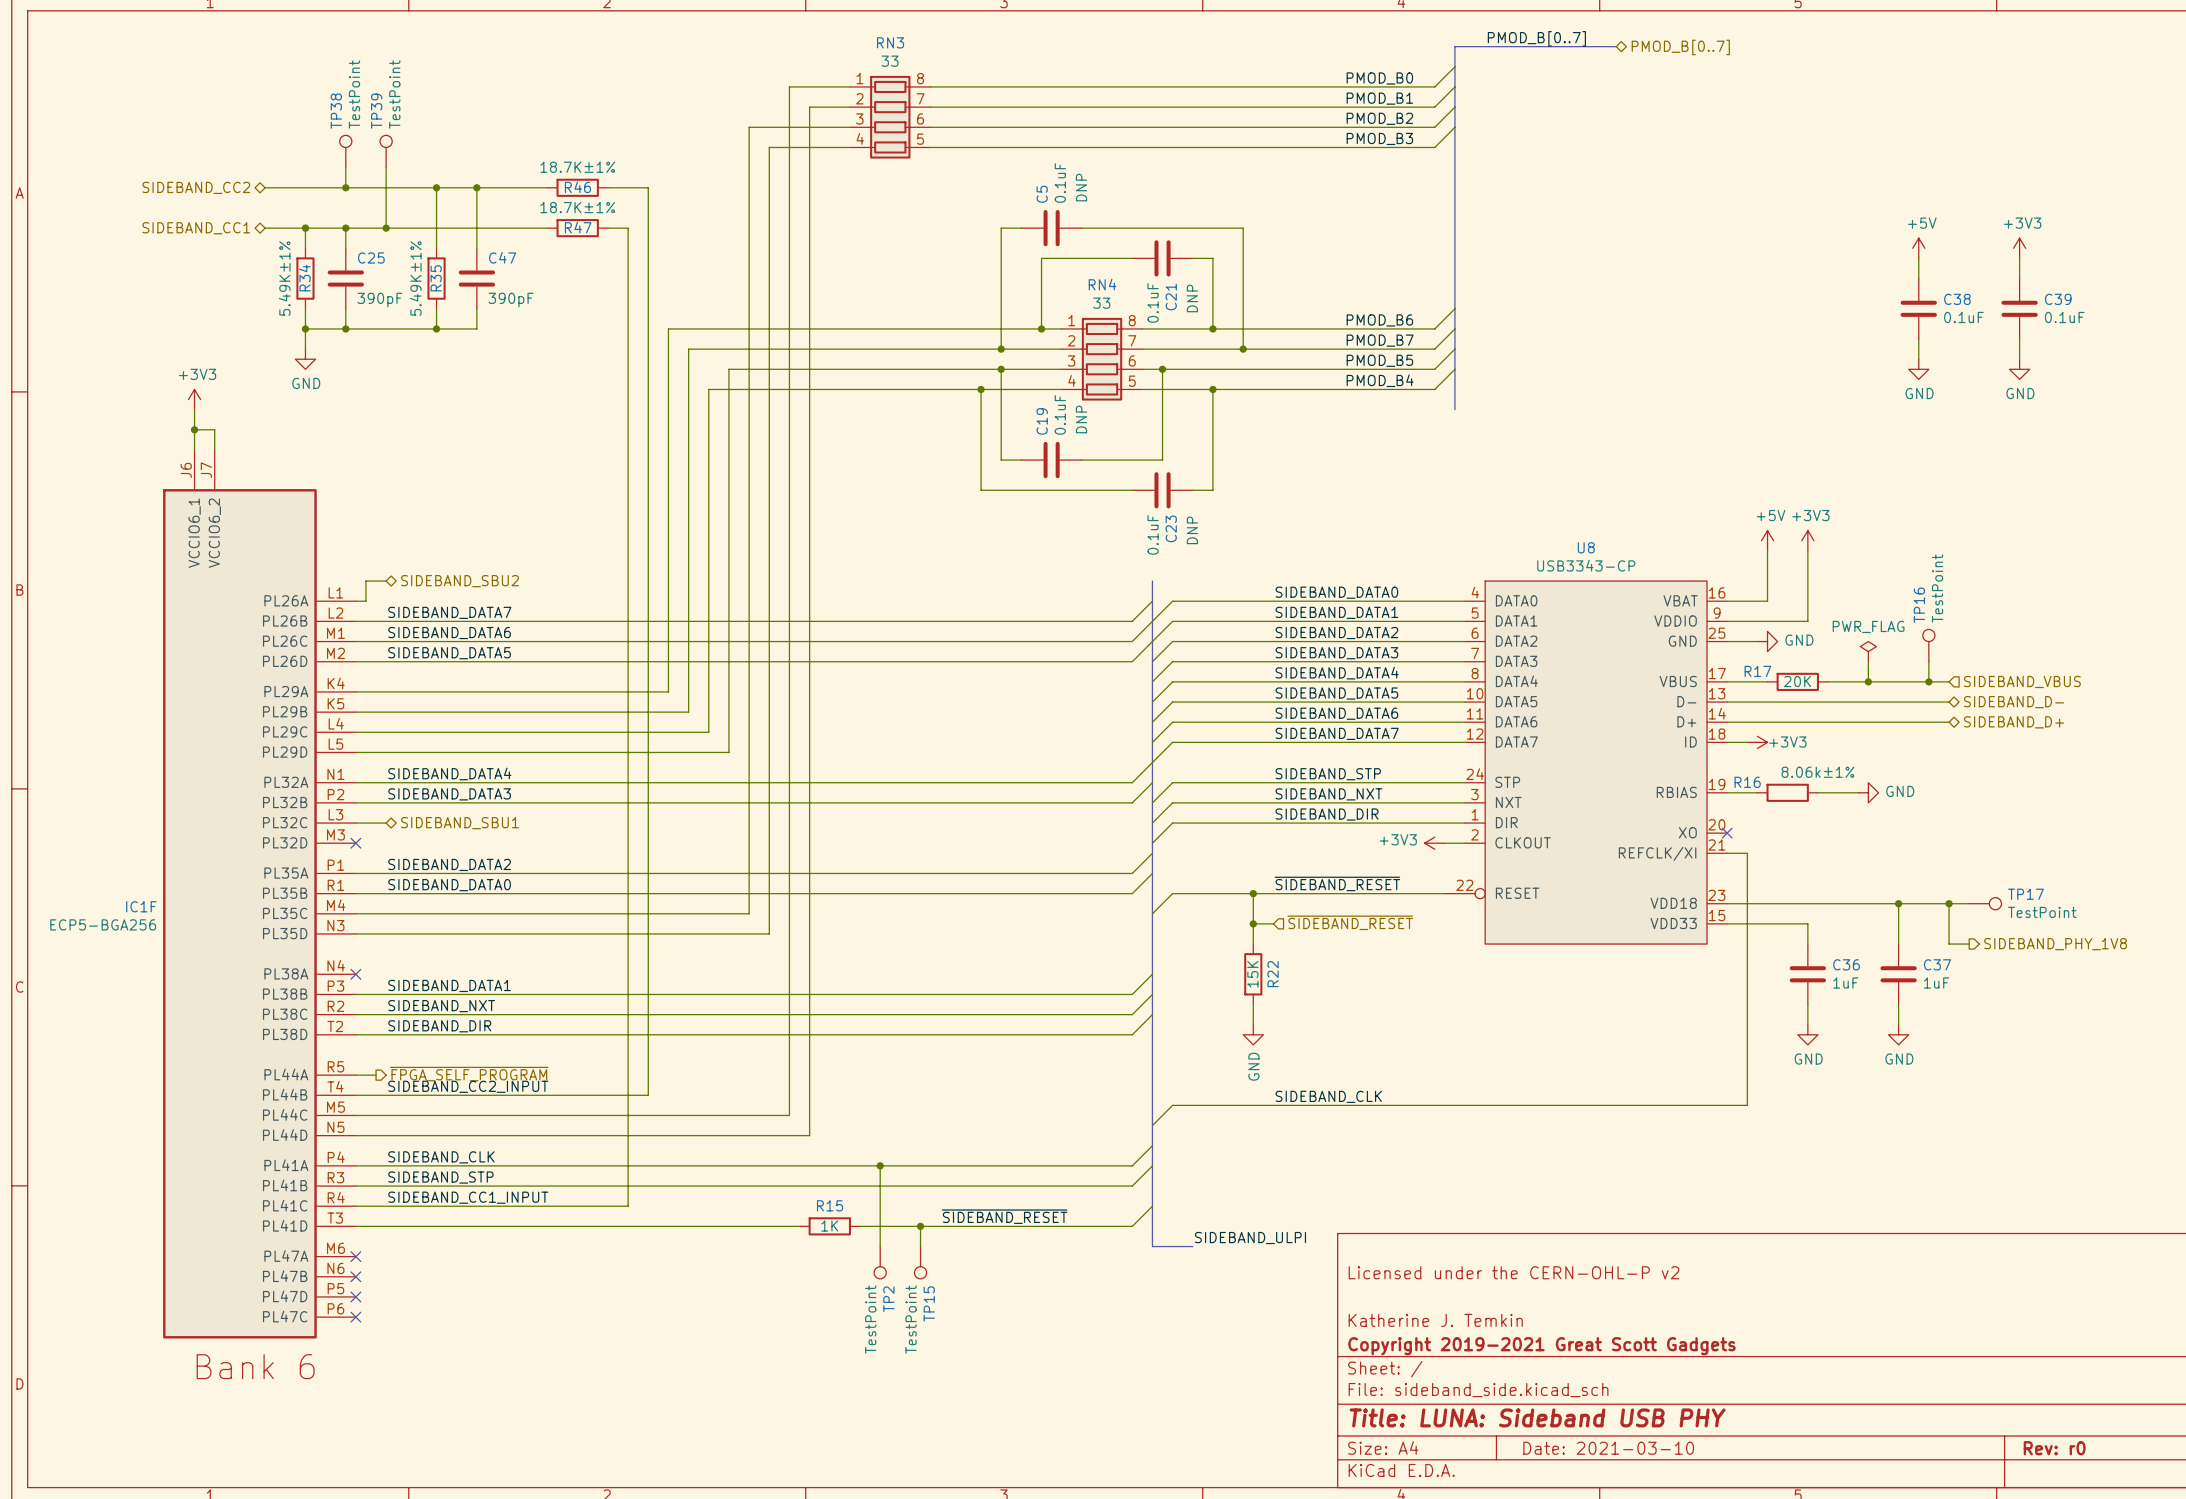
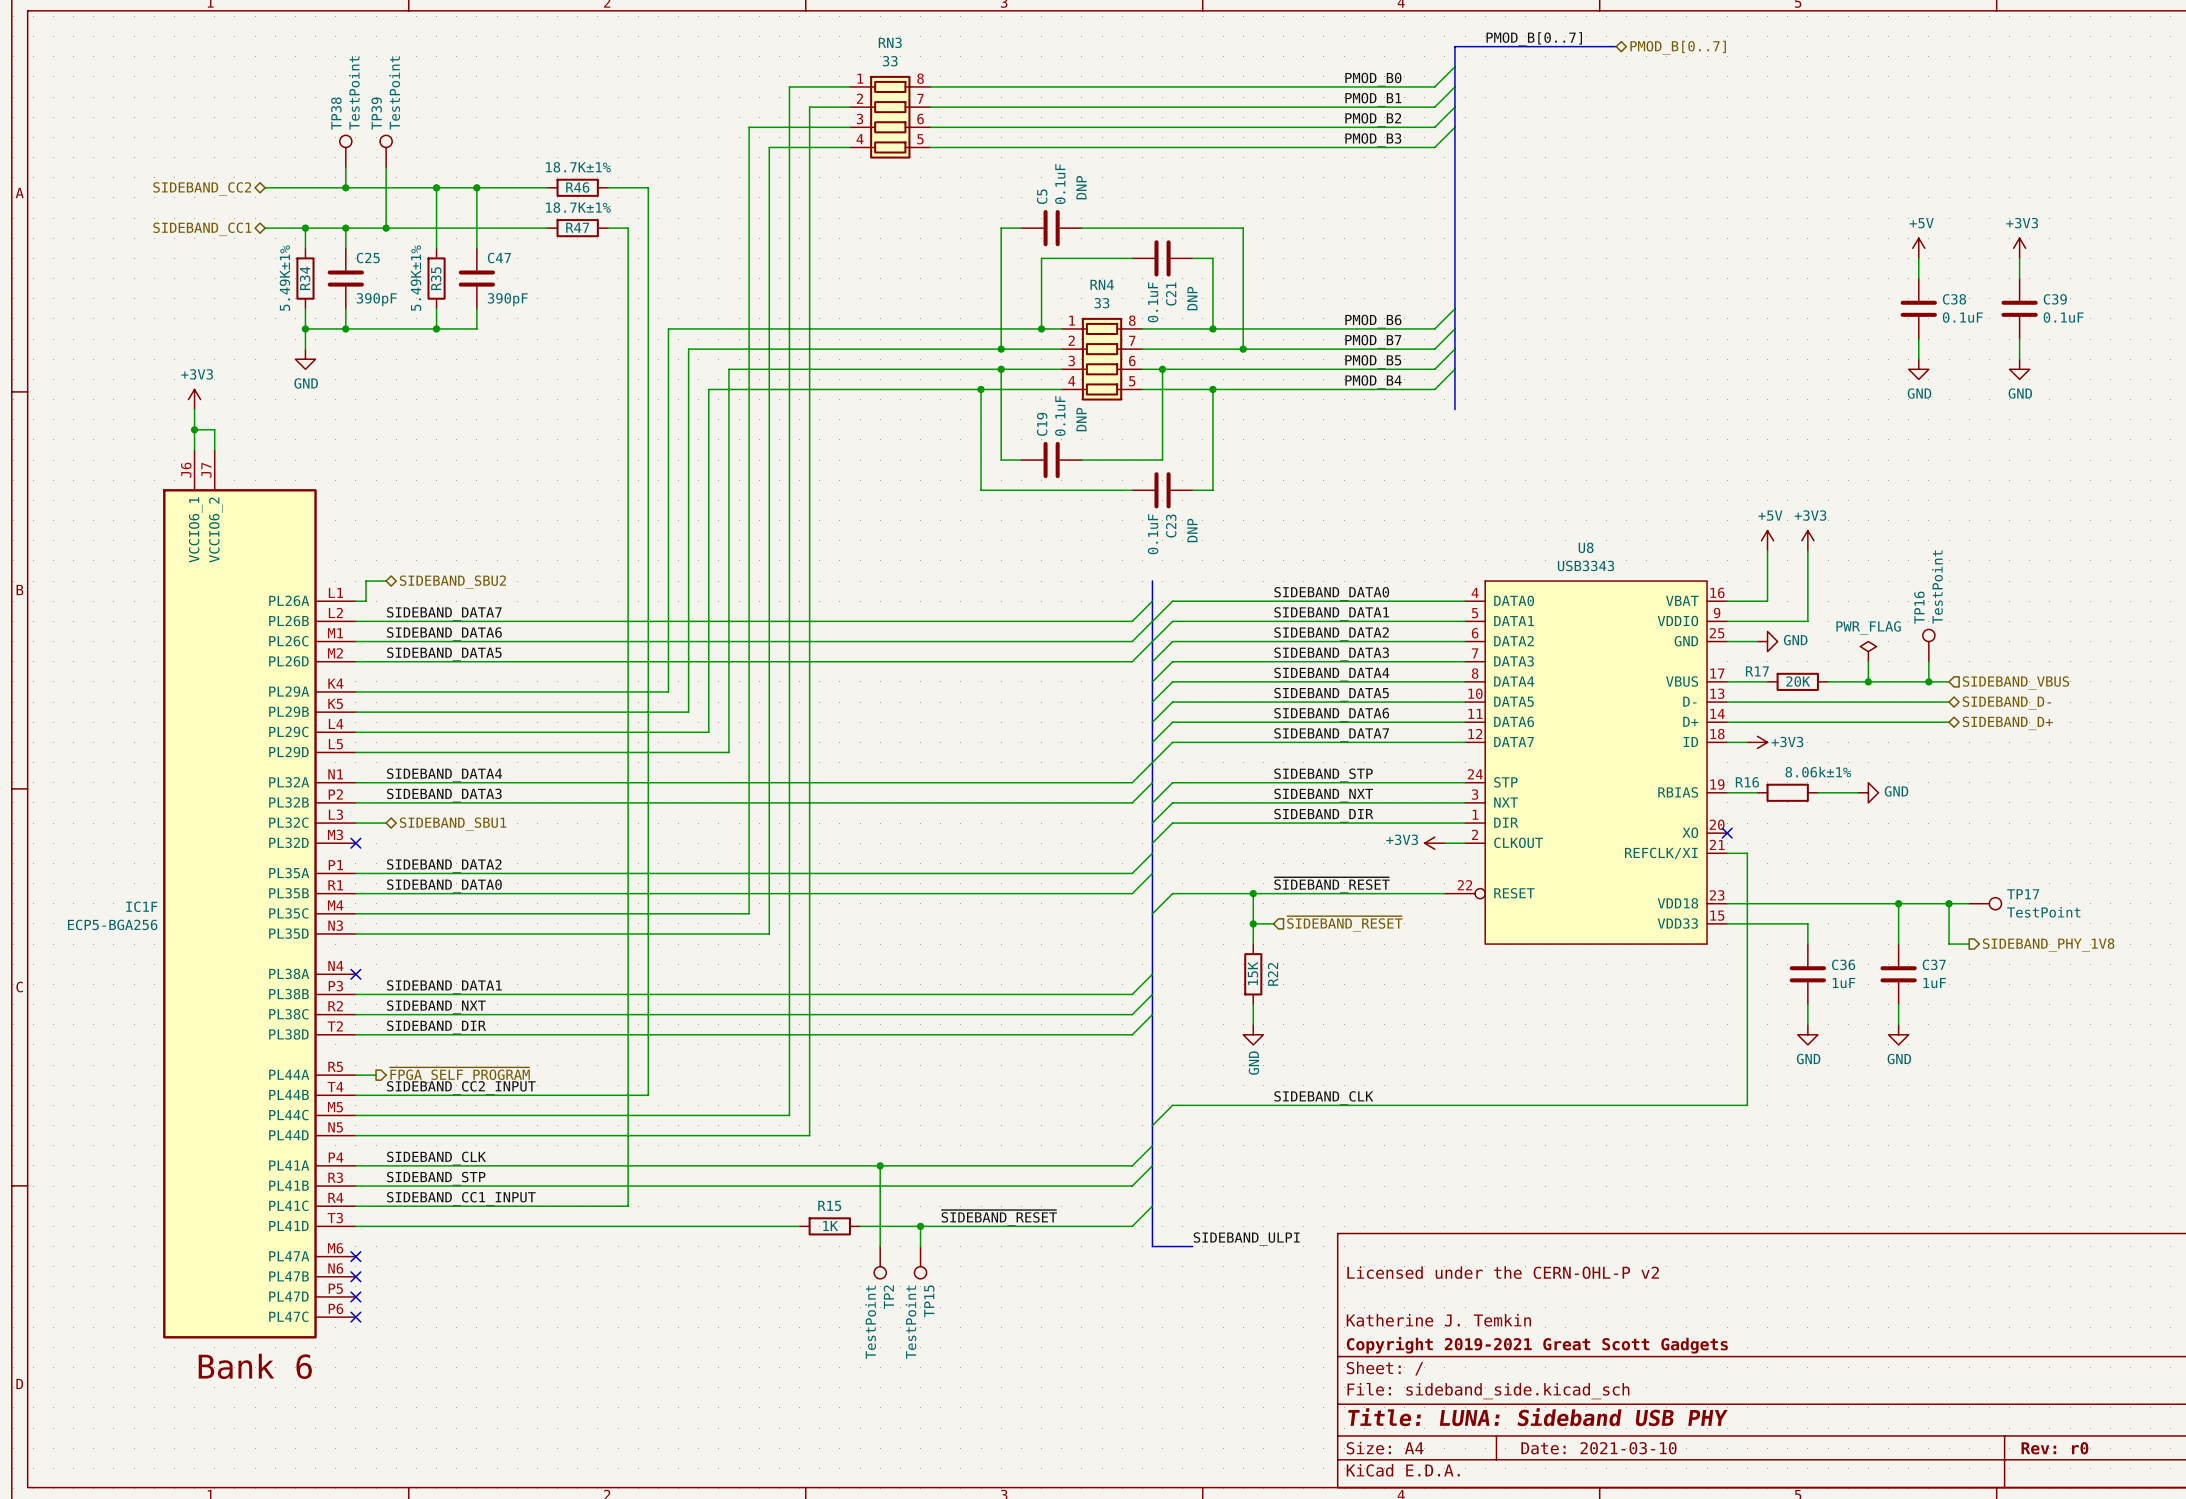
U8 value: USB3343-CP (1586, 565) -> USB3343 (1586, 565)

